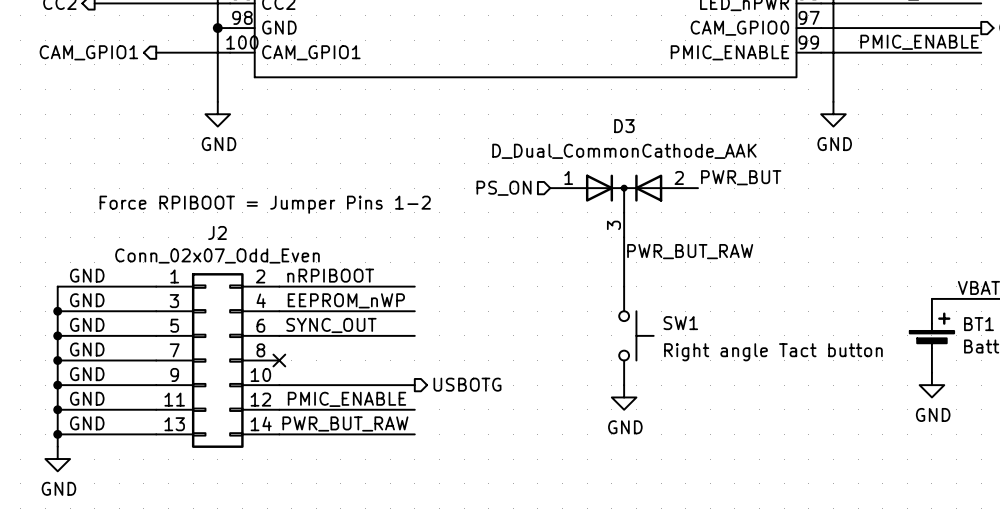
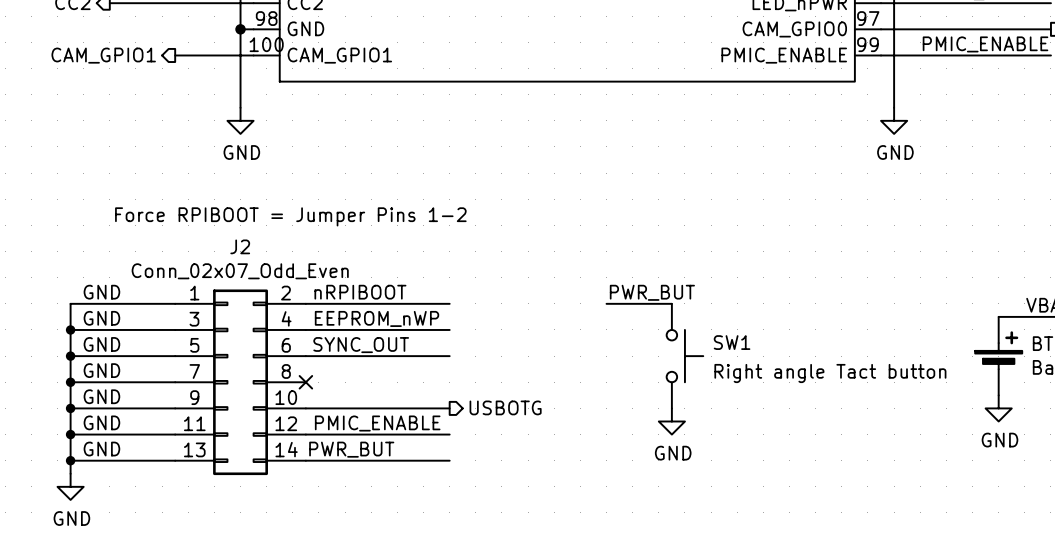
label position: PWR_BUT (741, 177) -> PWR_BUT (652, 292)
hierarchical label: PS_ON (504, 188) -> none
D3: D_Dual_CommonCathode_AAK (624, 205) -> none
wire: (624, 237) (624, 286) -> (606, 303) (671, 303)
label: PWR_BUT_RAW (690, 251) -> none
label: PWR_BUT_RAW (345, 423) -> PWR_BUT (351, 449)

